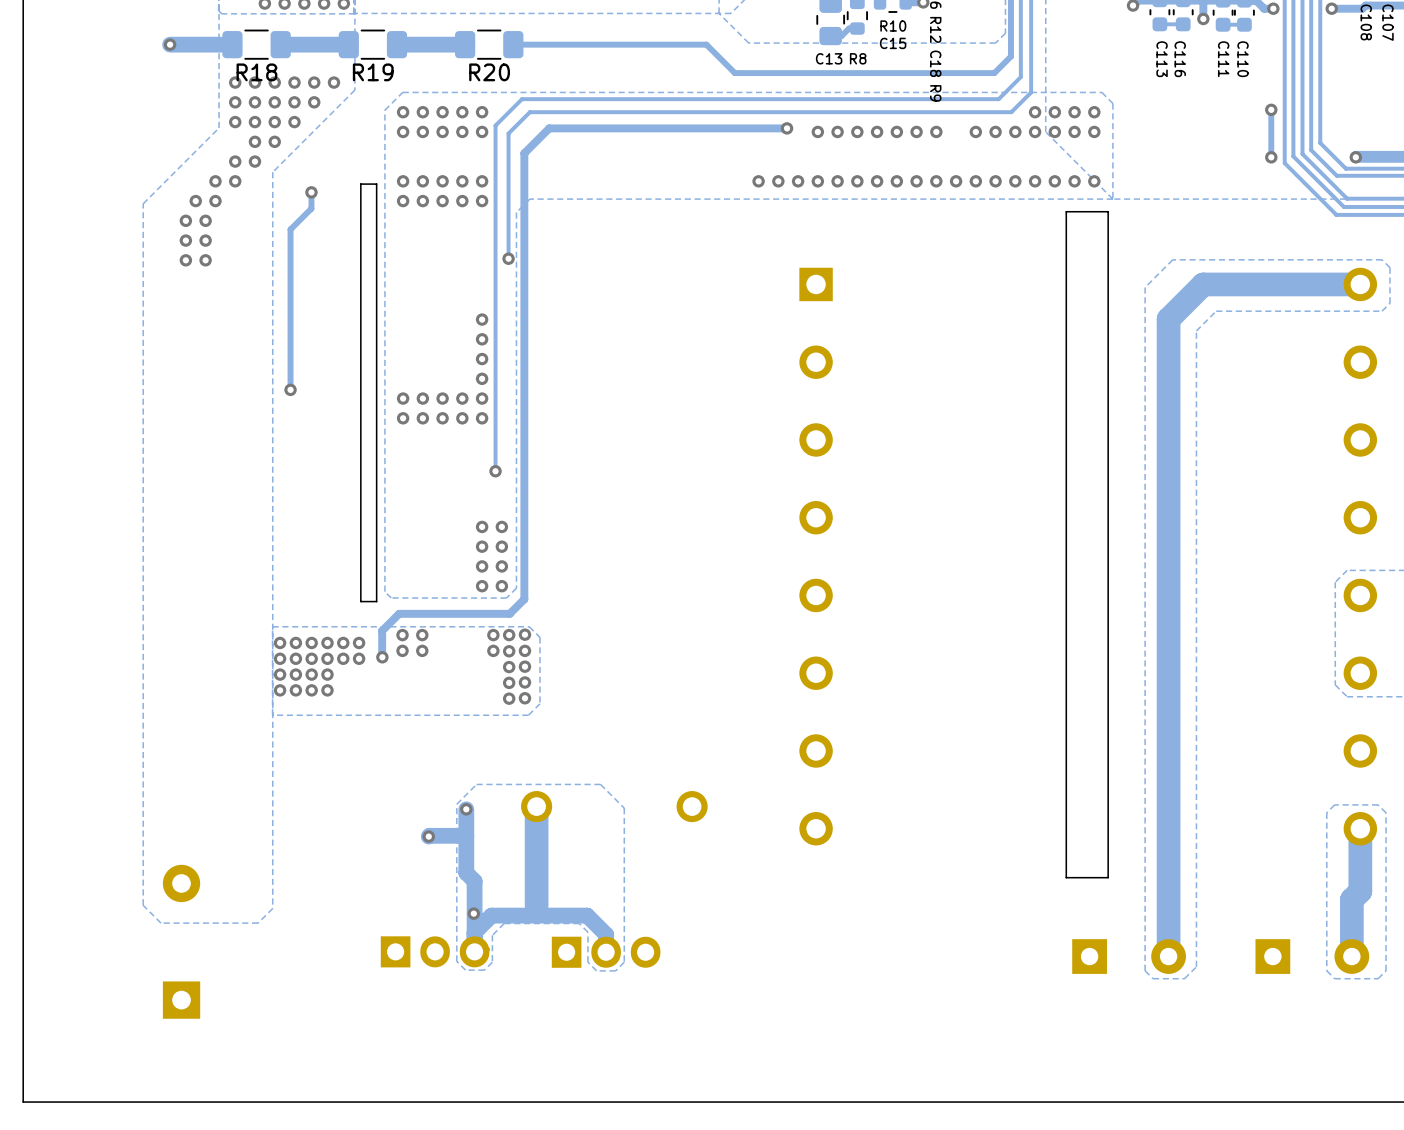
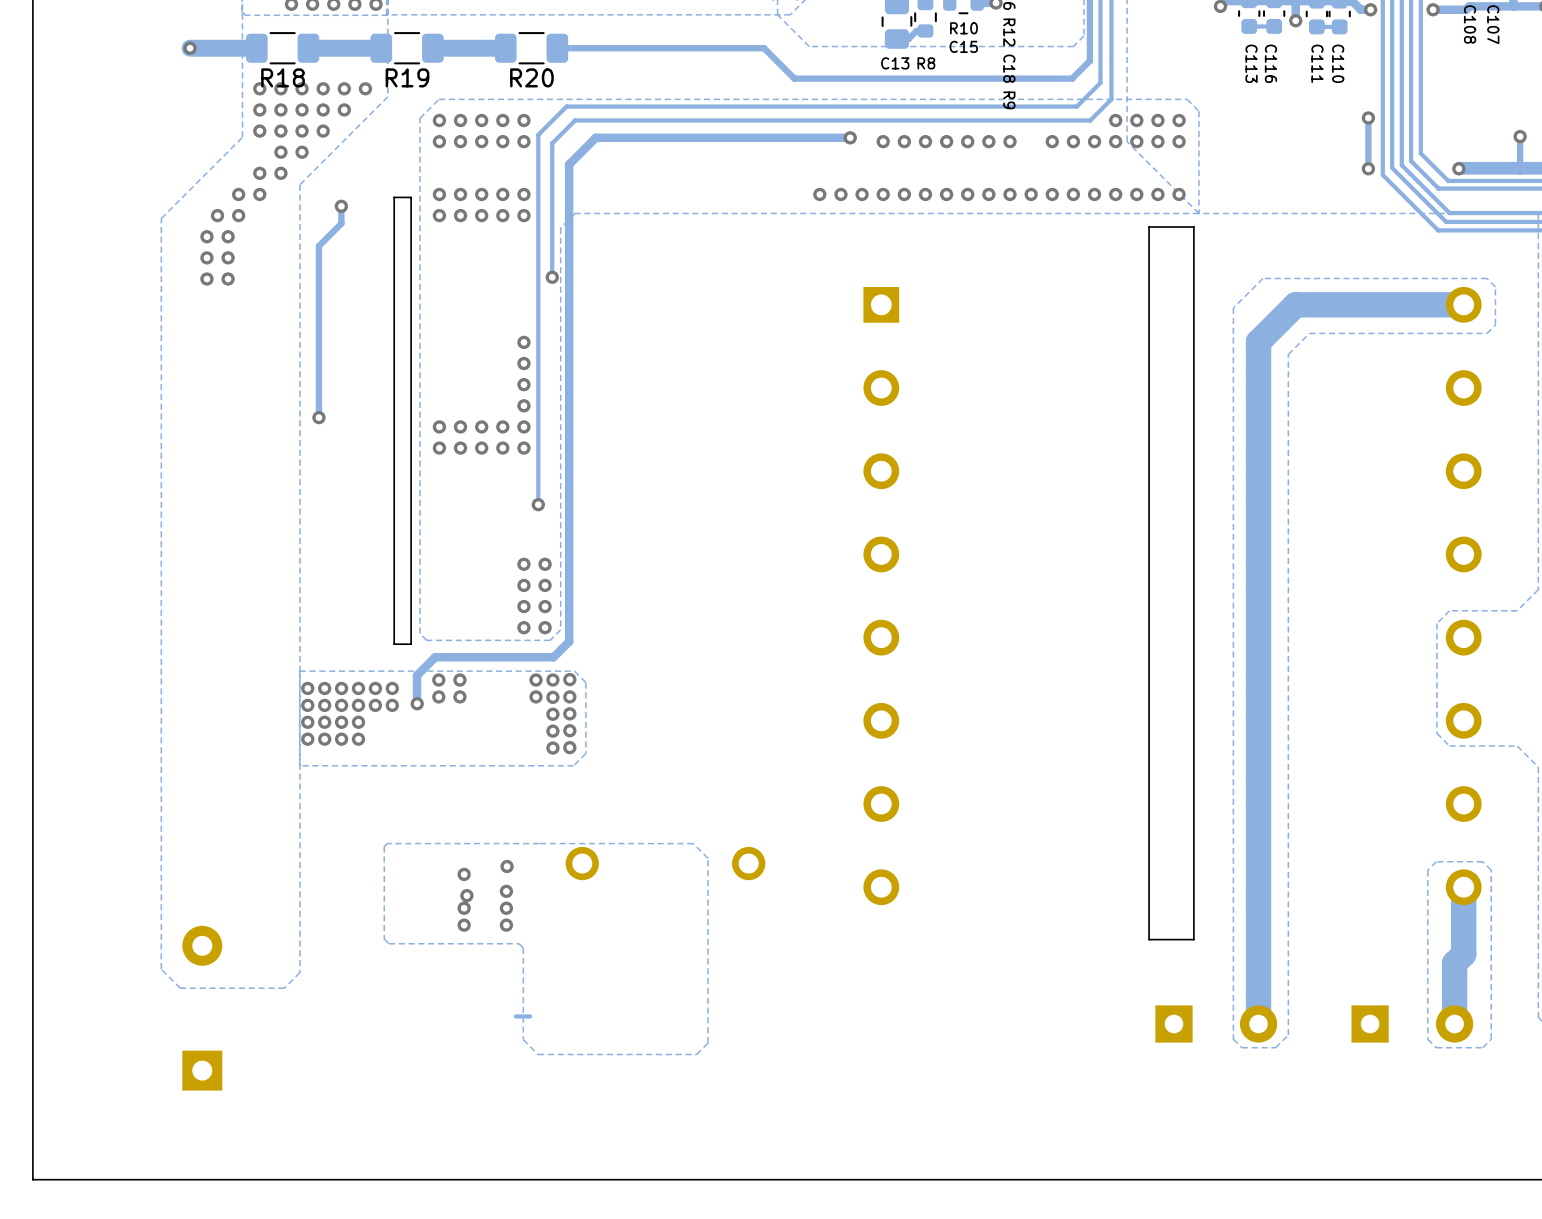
zone outline: (600, 784) (476, 784) (456, 804) (456, 961) (465, 970) (484, 970) (492, 962) (492, 935) (504, 923) (579, 923) (587, 932) (587, 962) (596, 970) (615, 970) (624, 962) (624, 808) (600, 784) -> (693, 843) (708, 858) (708, 1043) (696, 1054) (538, 1054) (523, 1039) (523, 947) (519, 943) (388, 943) (384, 939) (384, 846) (387, 843) (693, 843)
track: (536, 806) (536, 906) -> none
track: (466, 809) (466, 872) (474, 881) (474, 951) -> none
via: none -> (464, 874)
via: none -> (506, 891)
track: (466, 835) (428, 836) -> none
via: none -> (464, 908)
via: none -> (506, 908)
via: none -> (464, 925)
via: none -> (506, 925)
via: (473, 913) -> none
track: (474, 932) (491, 915) (587, 915) (606, 934) (606, 952) -> none
part: (435, 951) -> none
part: (606, 952) -> none

